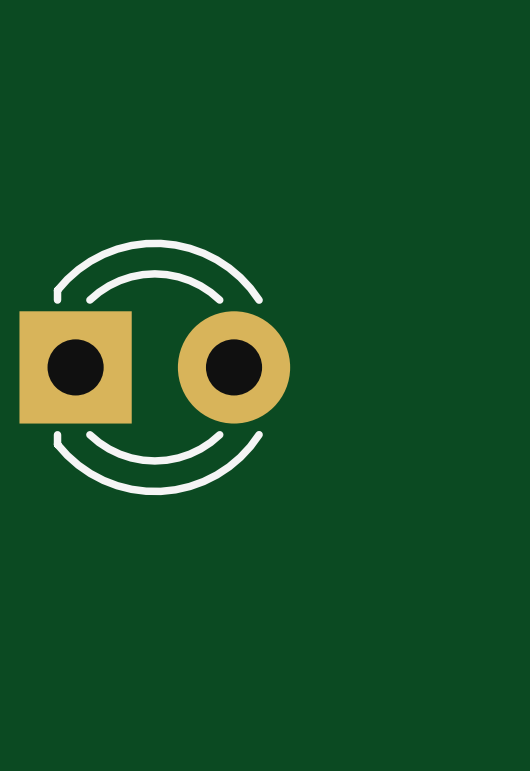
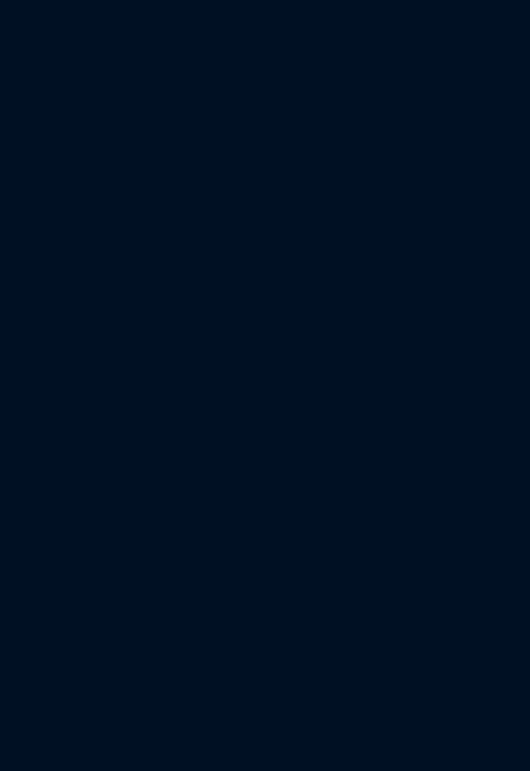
part: (154, 367) -> none

